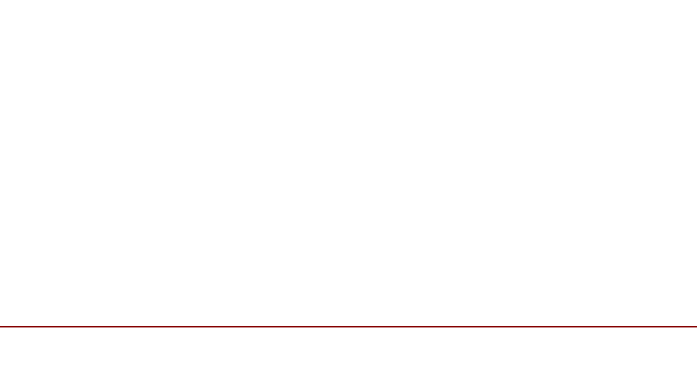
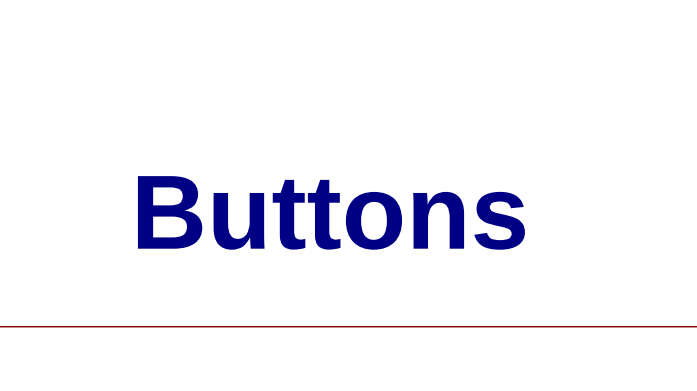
text: none -> Buttons (331, 212)

